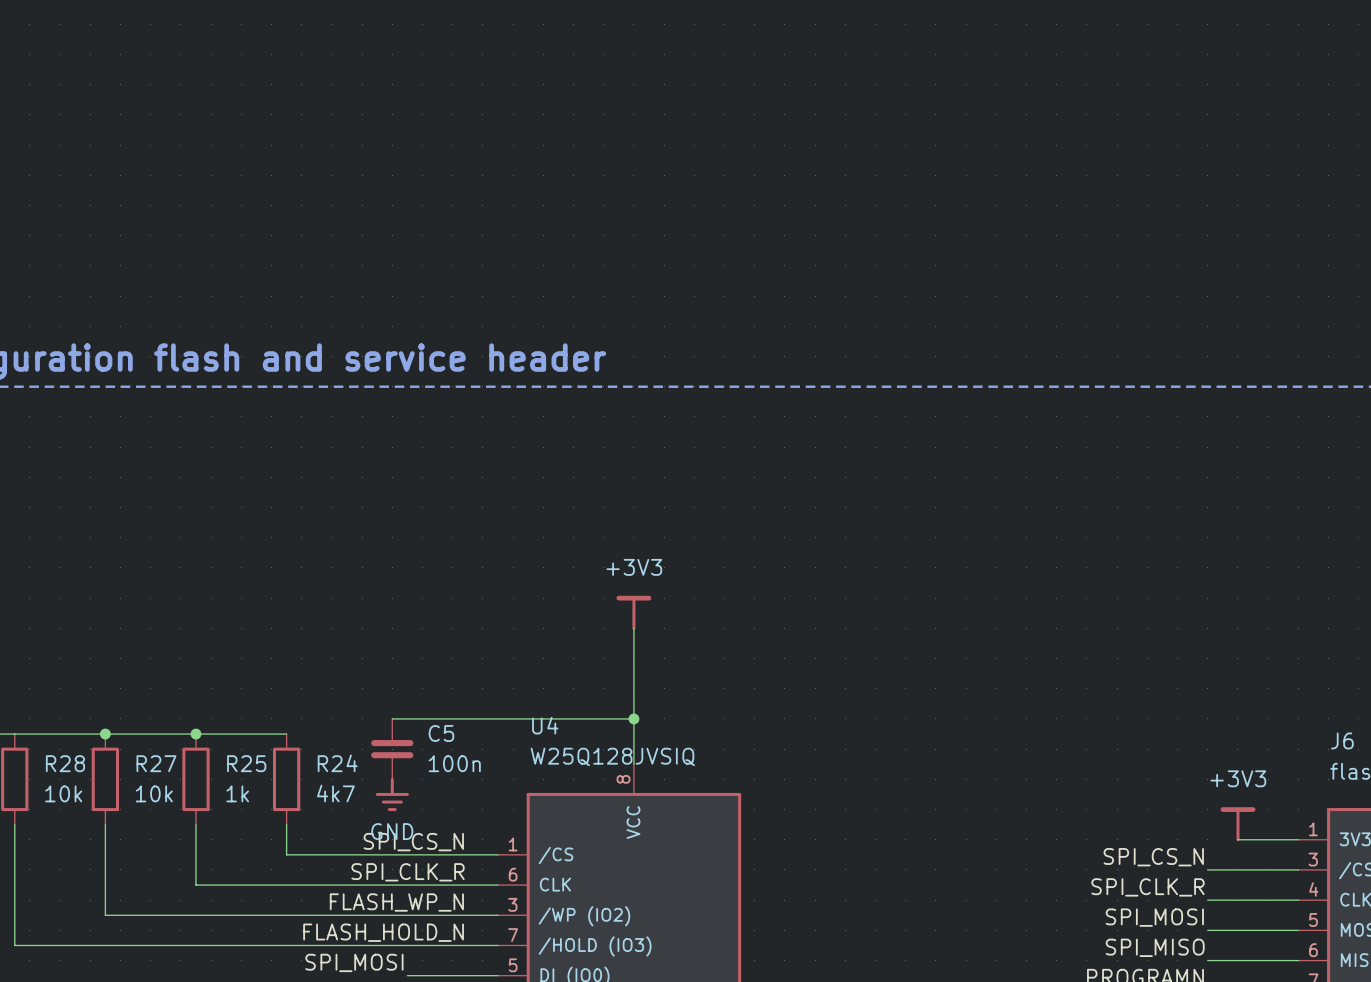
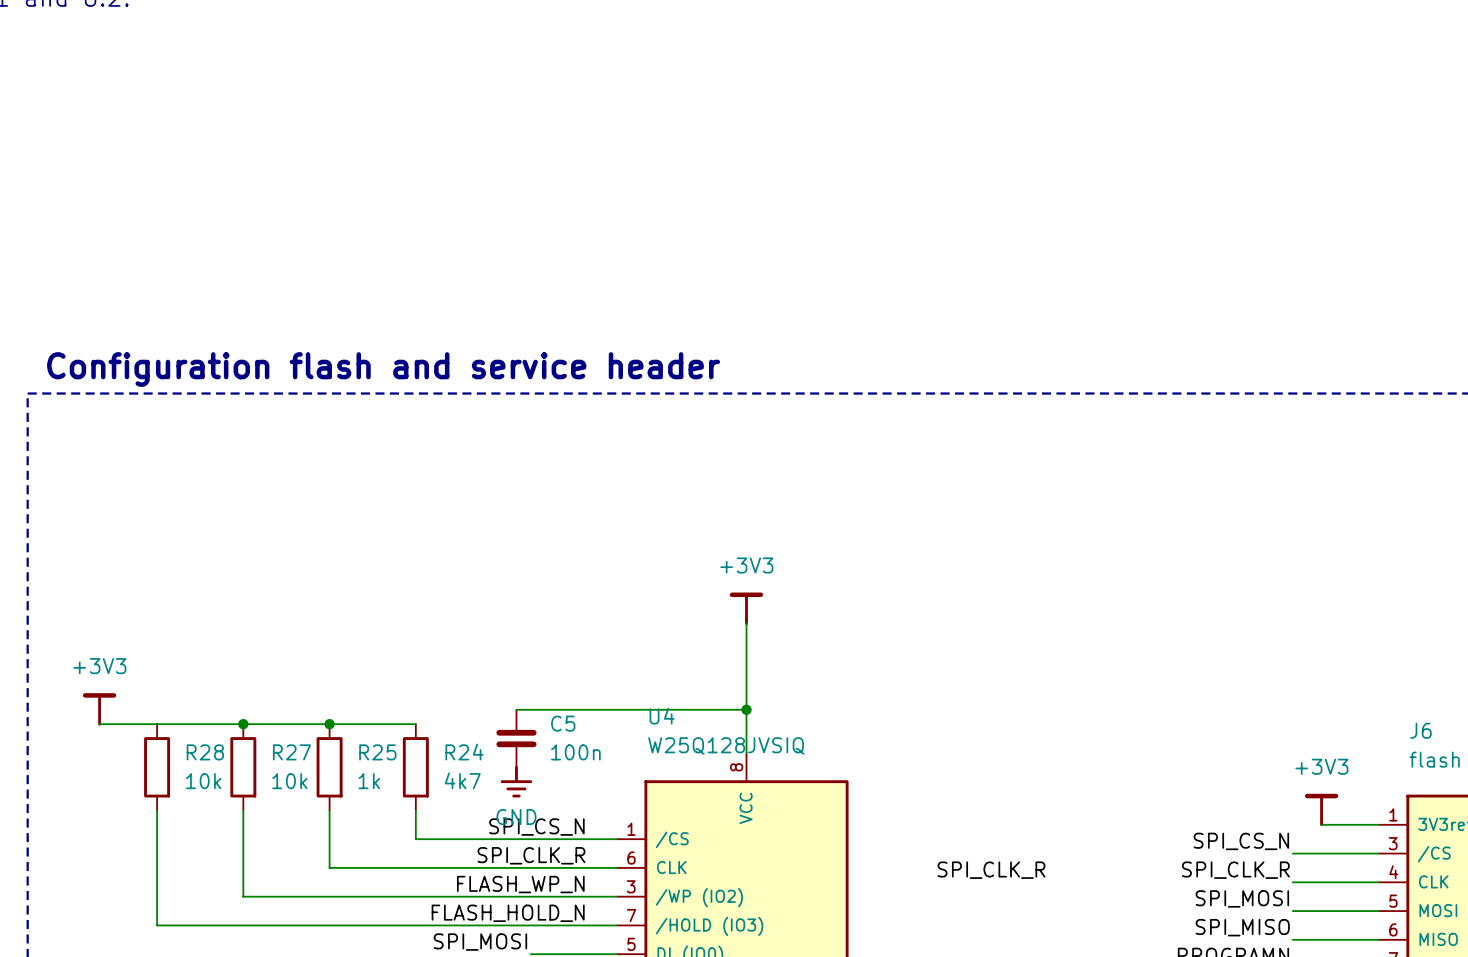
label: none -> SPI_CLK_R (991, 870)

